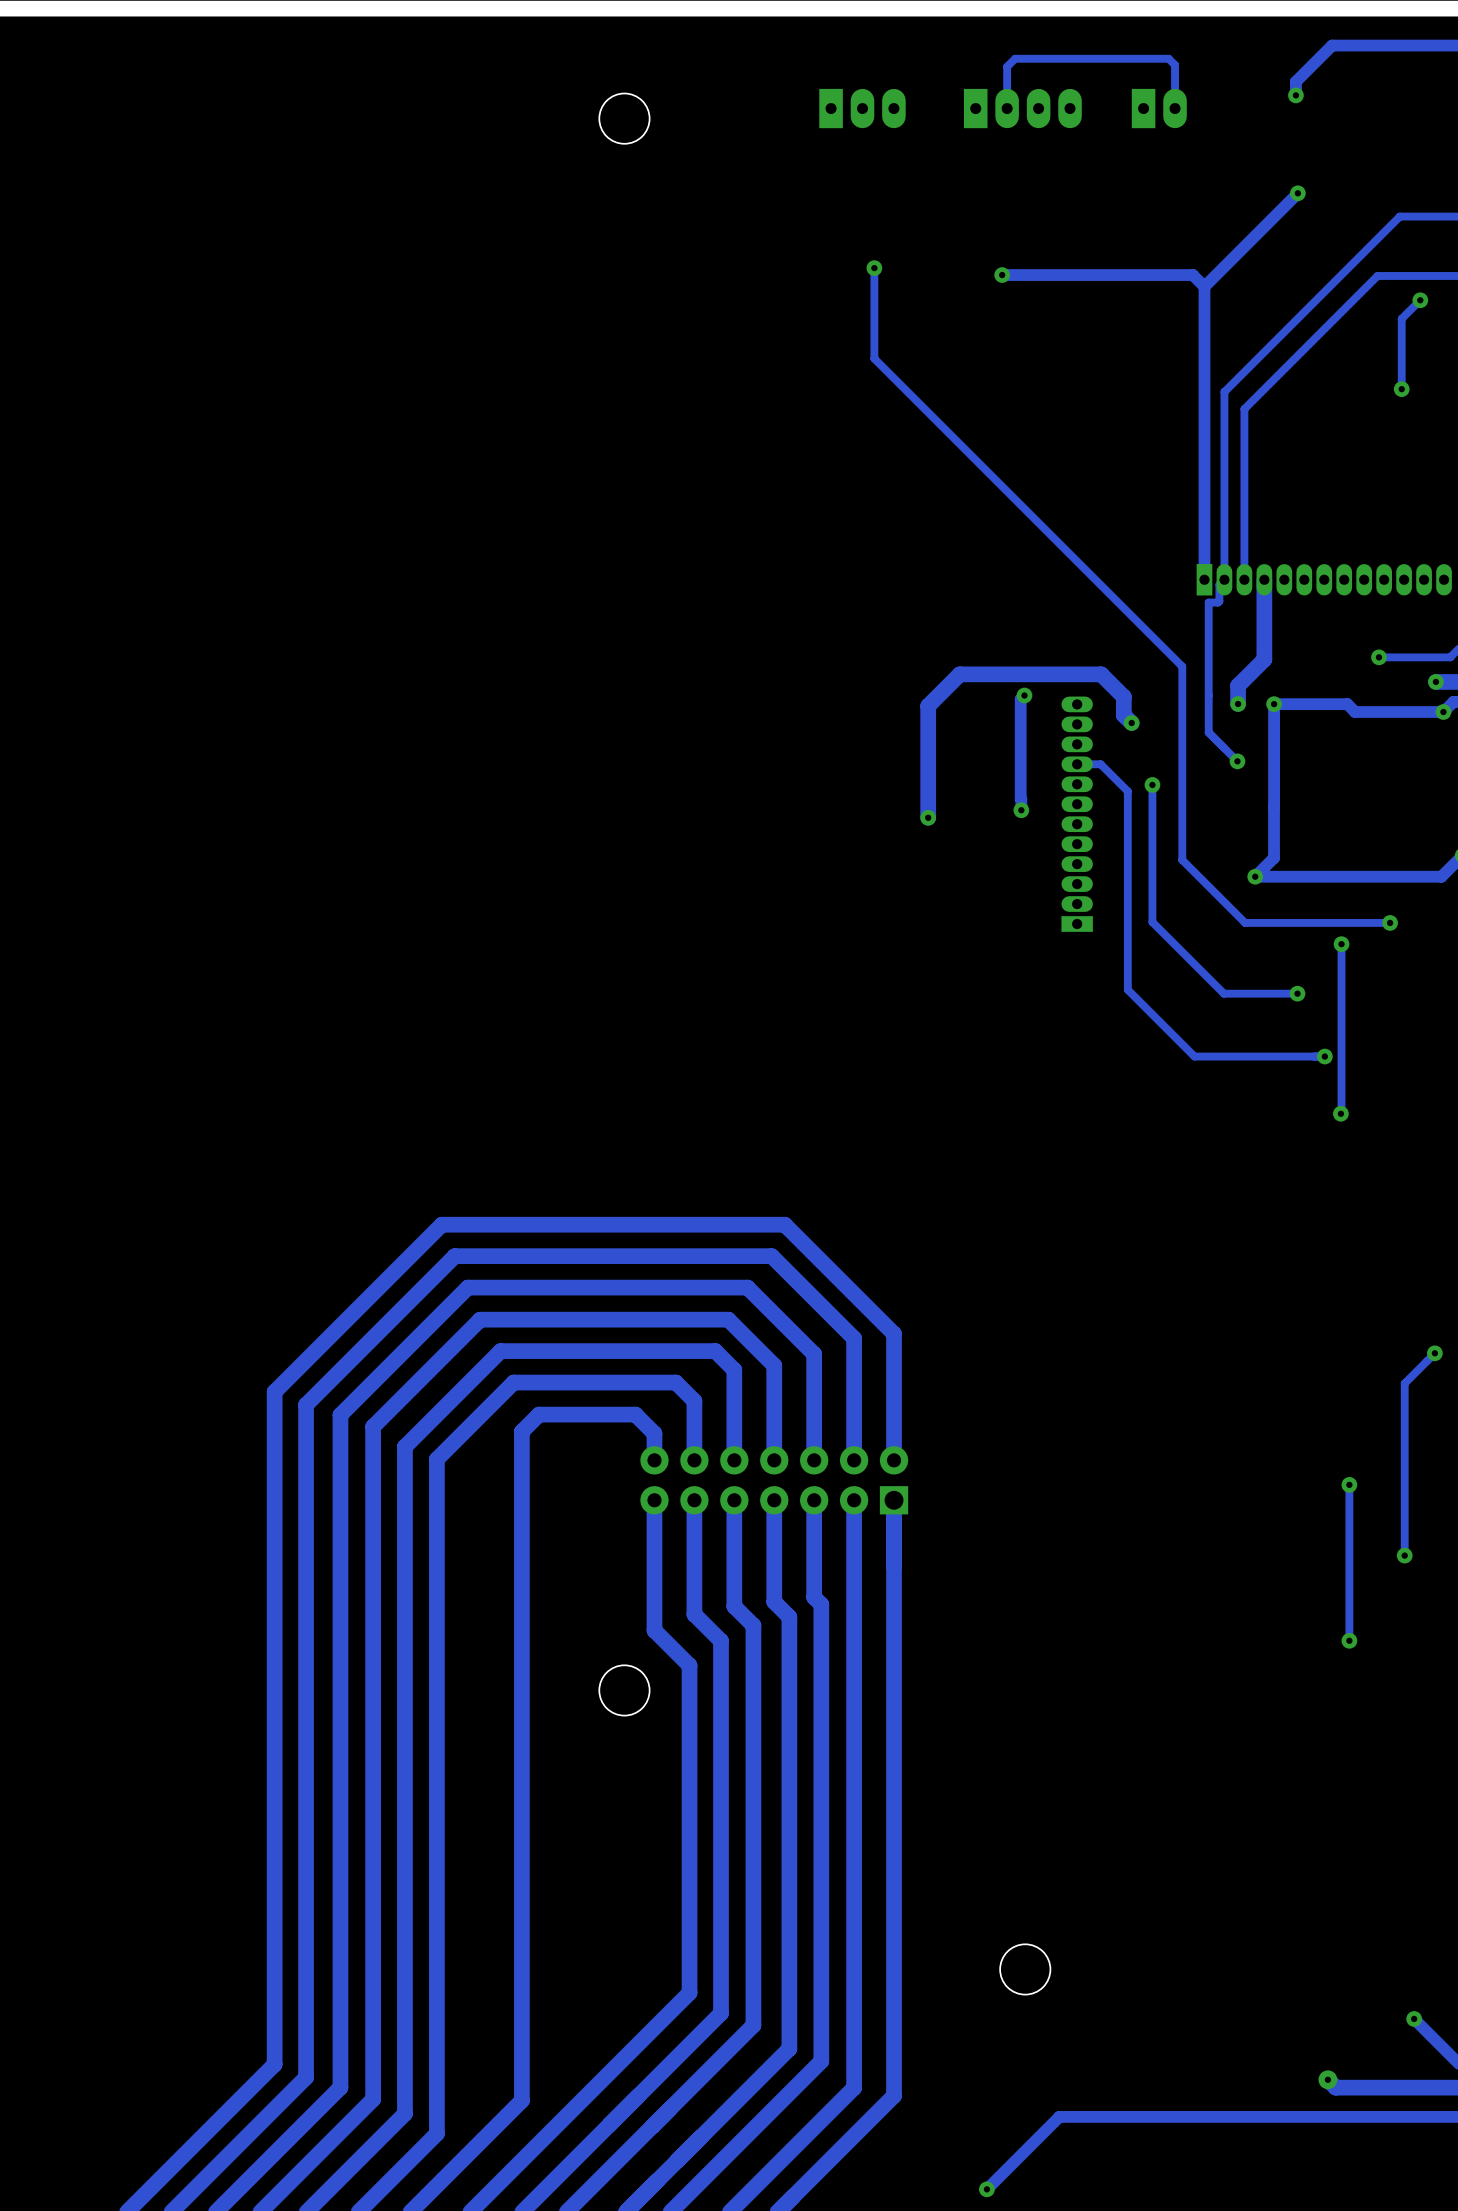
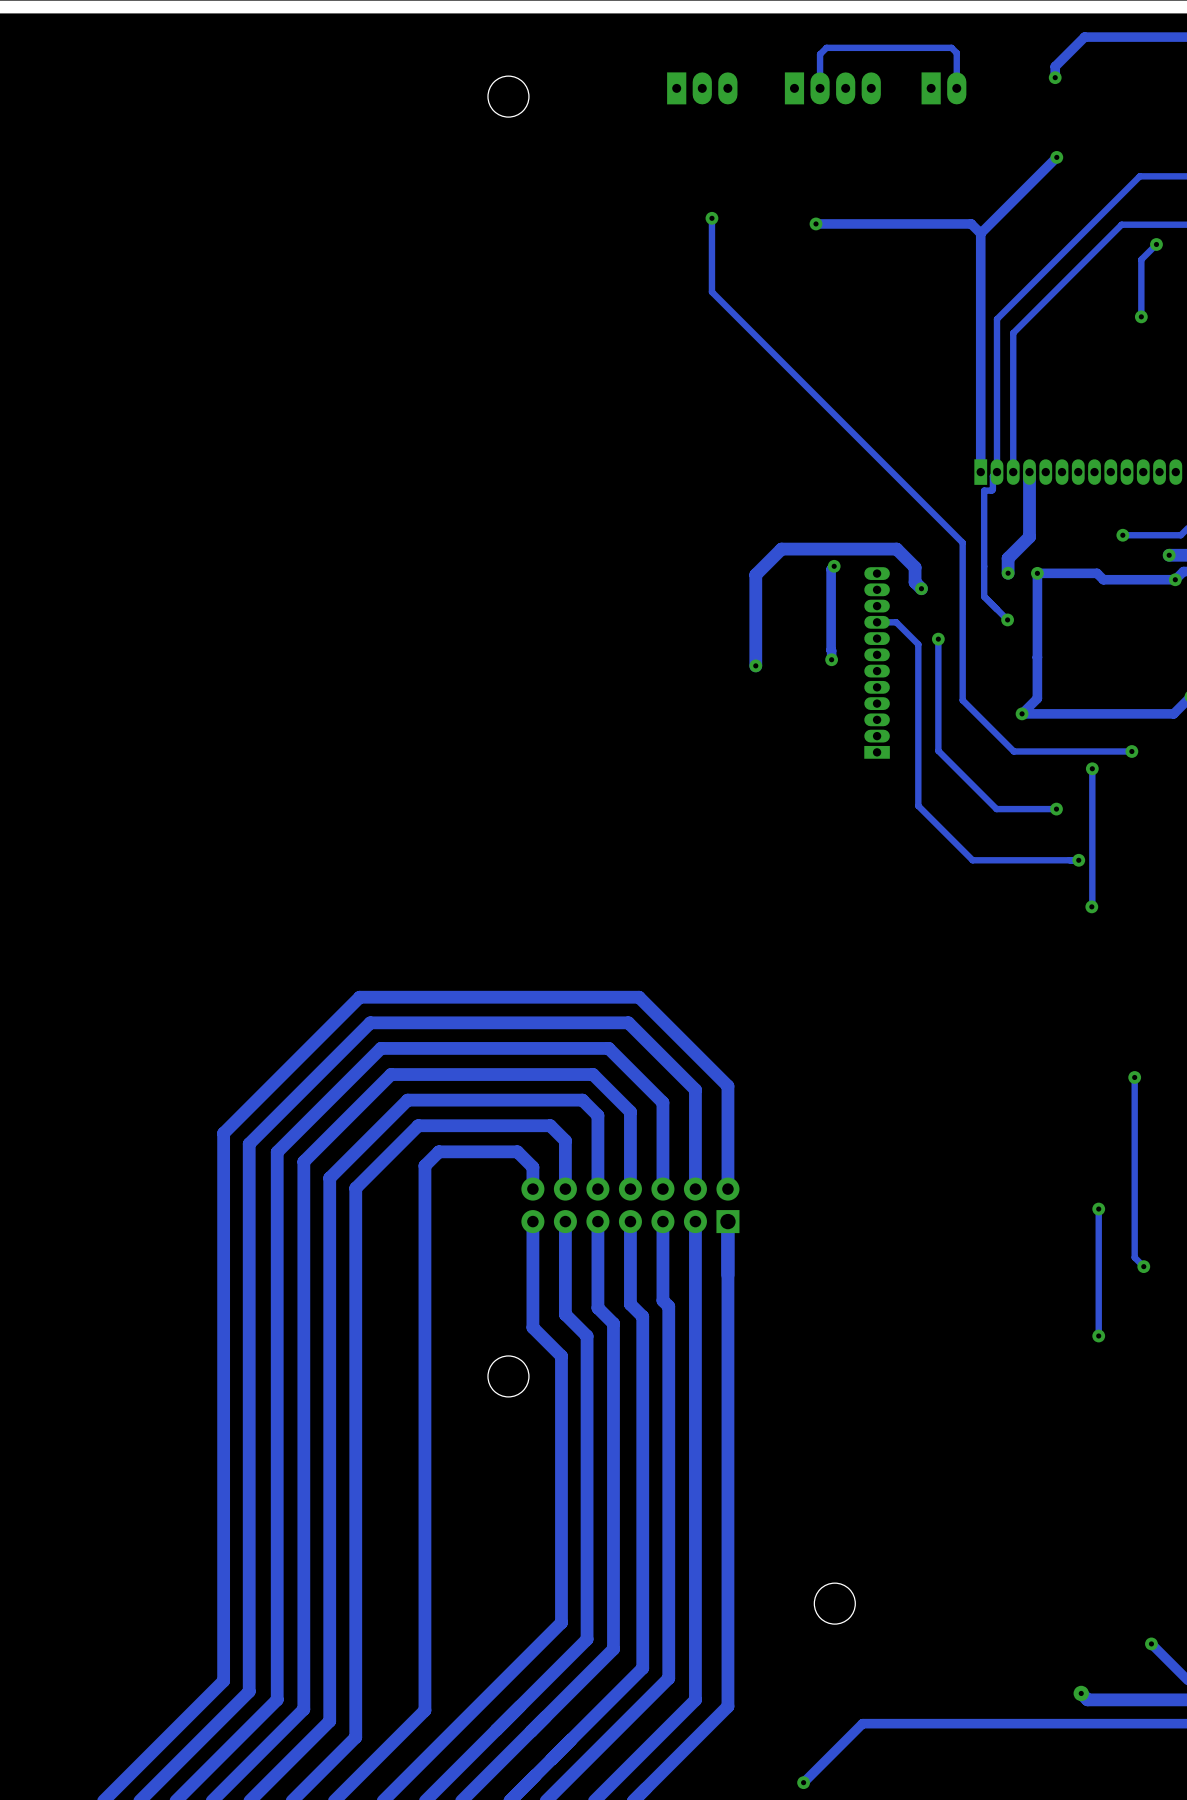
track: (1434, 1353) (1404, 1383) (1404, 1555) -> (1134, 1077) (1134, 1257) (1143, 1266)
via position: (1434, 1353) -> (1134, 1077)

